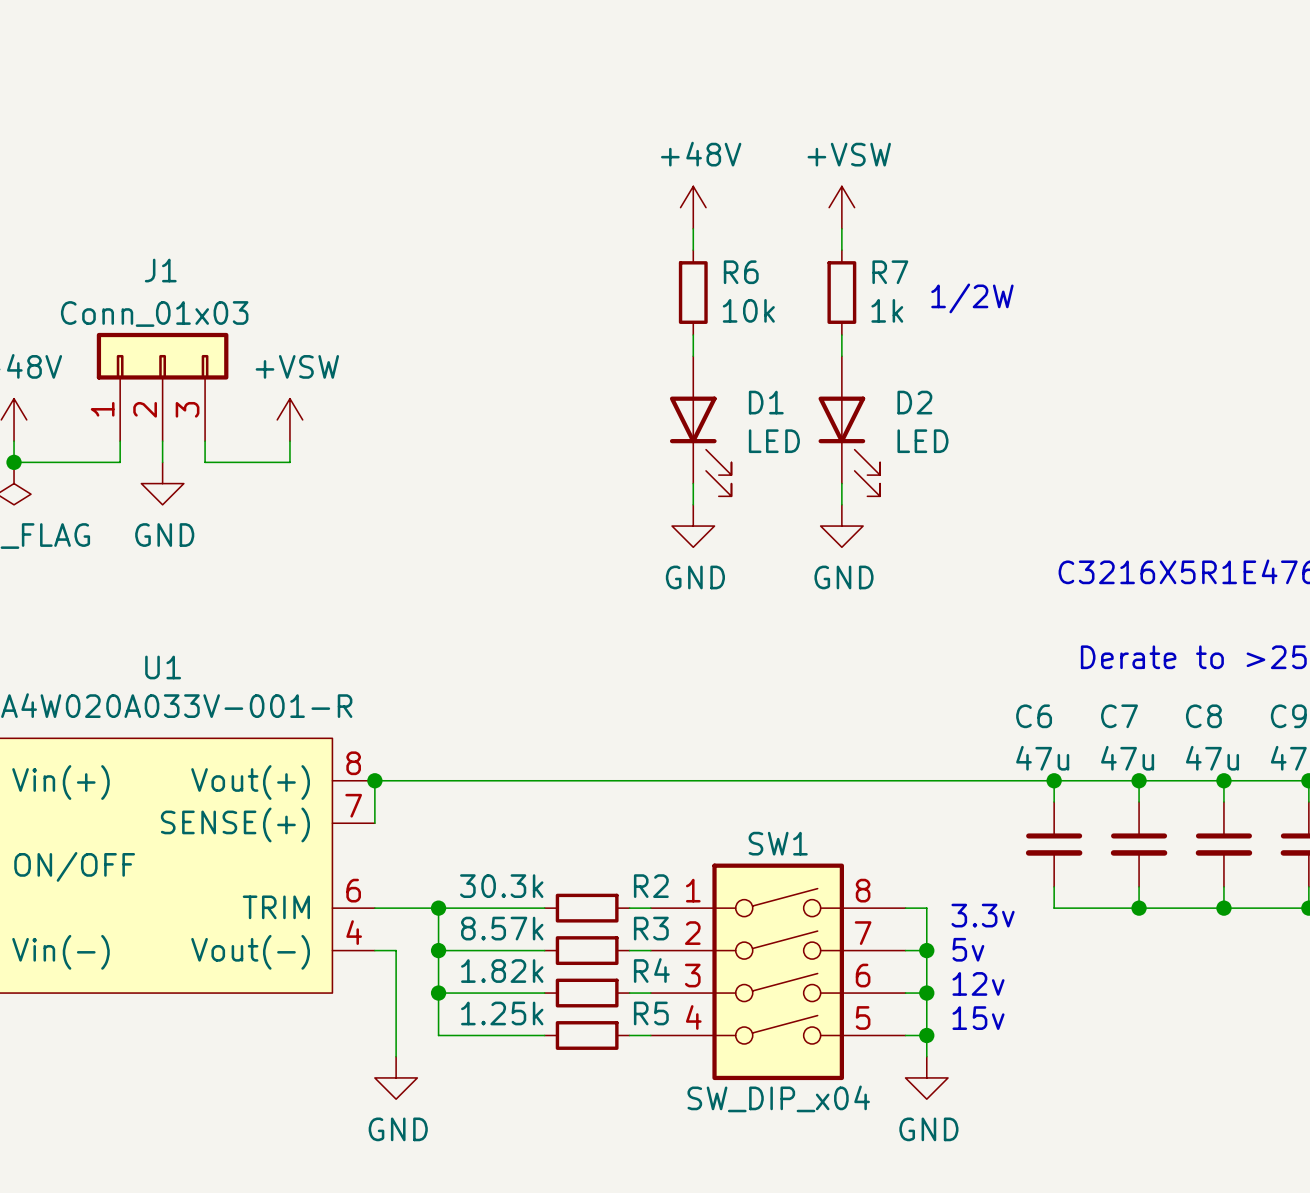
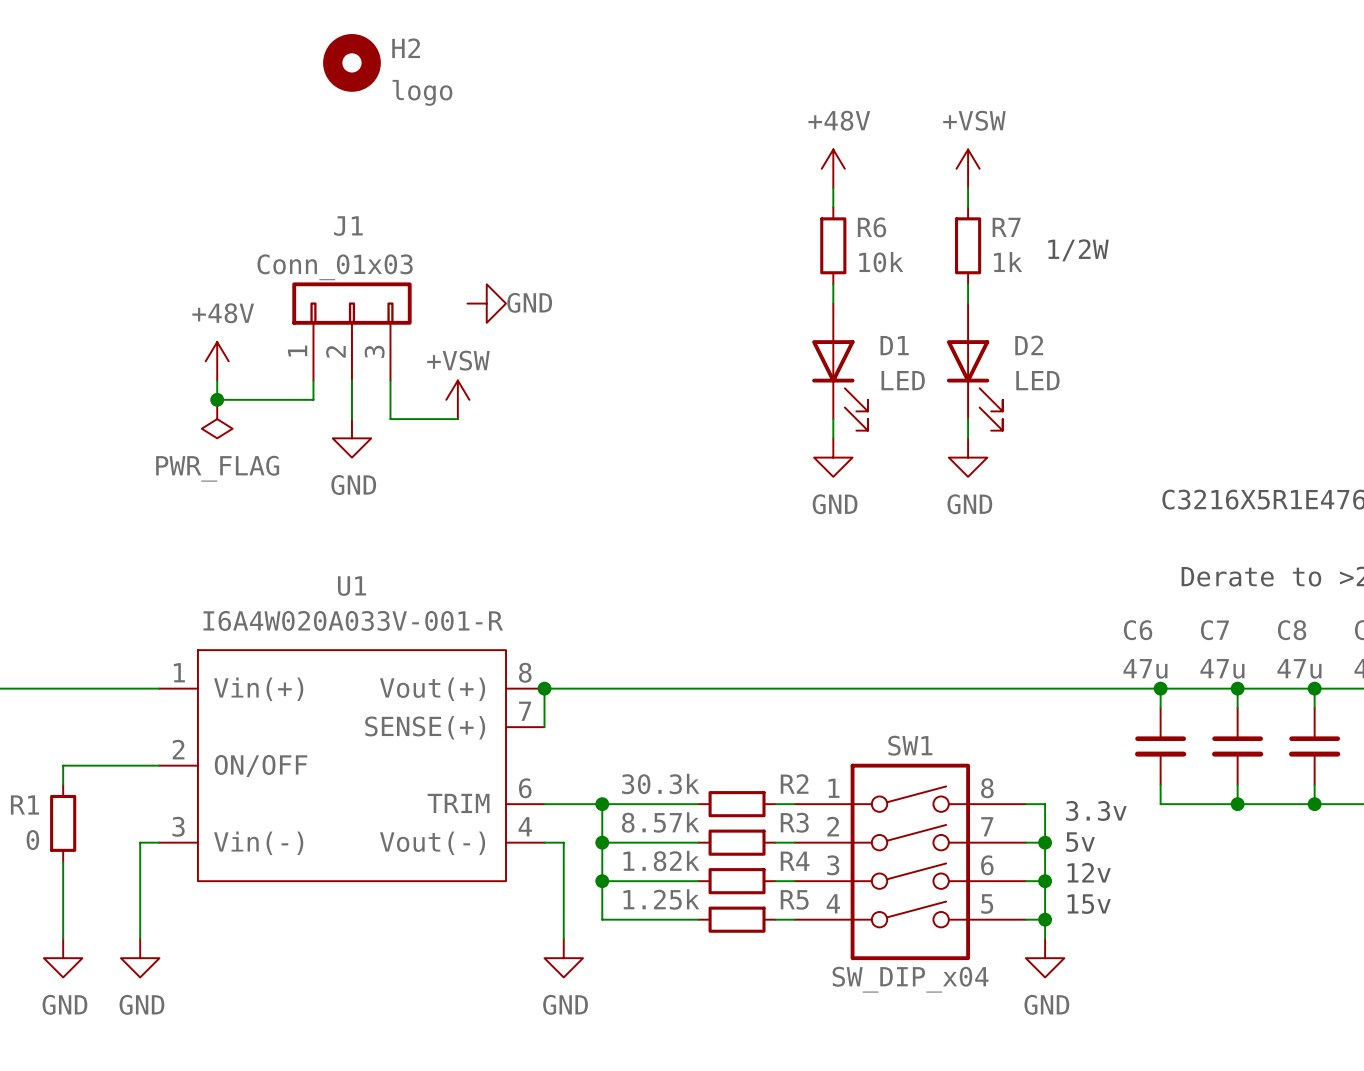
H2: none -> logo (351, 62)
power symbol: none -> GND (486, 303)
power symbol text position: +VSW (297, 366) -> +VSW (458, 360)
power symbol position: +VSW (289, 419) -> +VSW (457, 399)
wire: (289, 441) (289, 462) (205, 462) -> (457, 419) (390, 419) (390, 399)
power symbol position: GND (162, 483) -> GND (351, 438)

